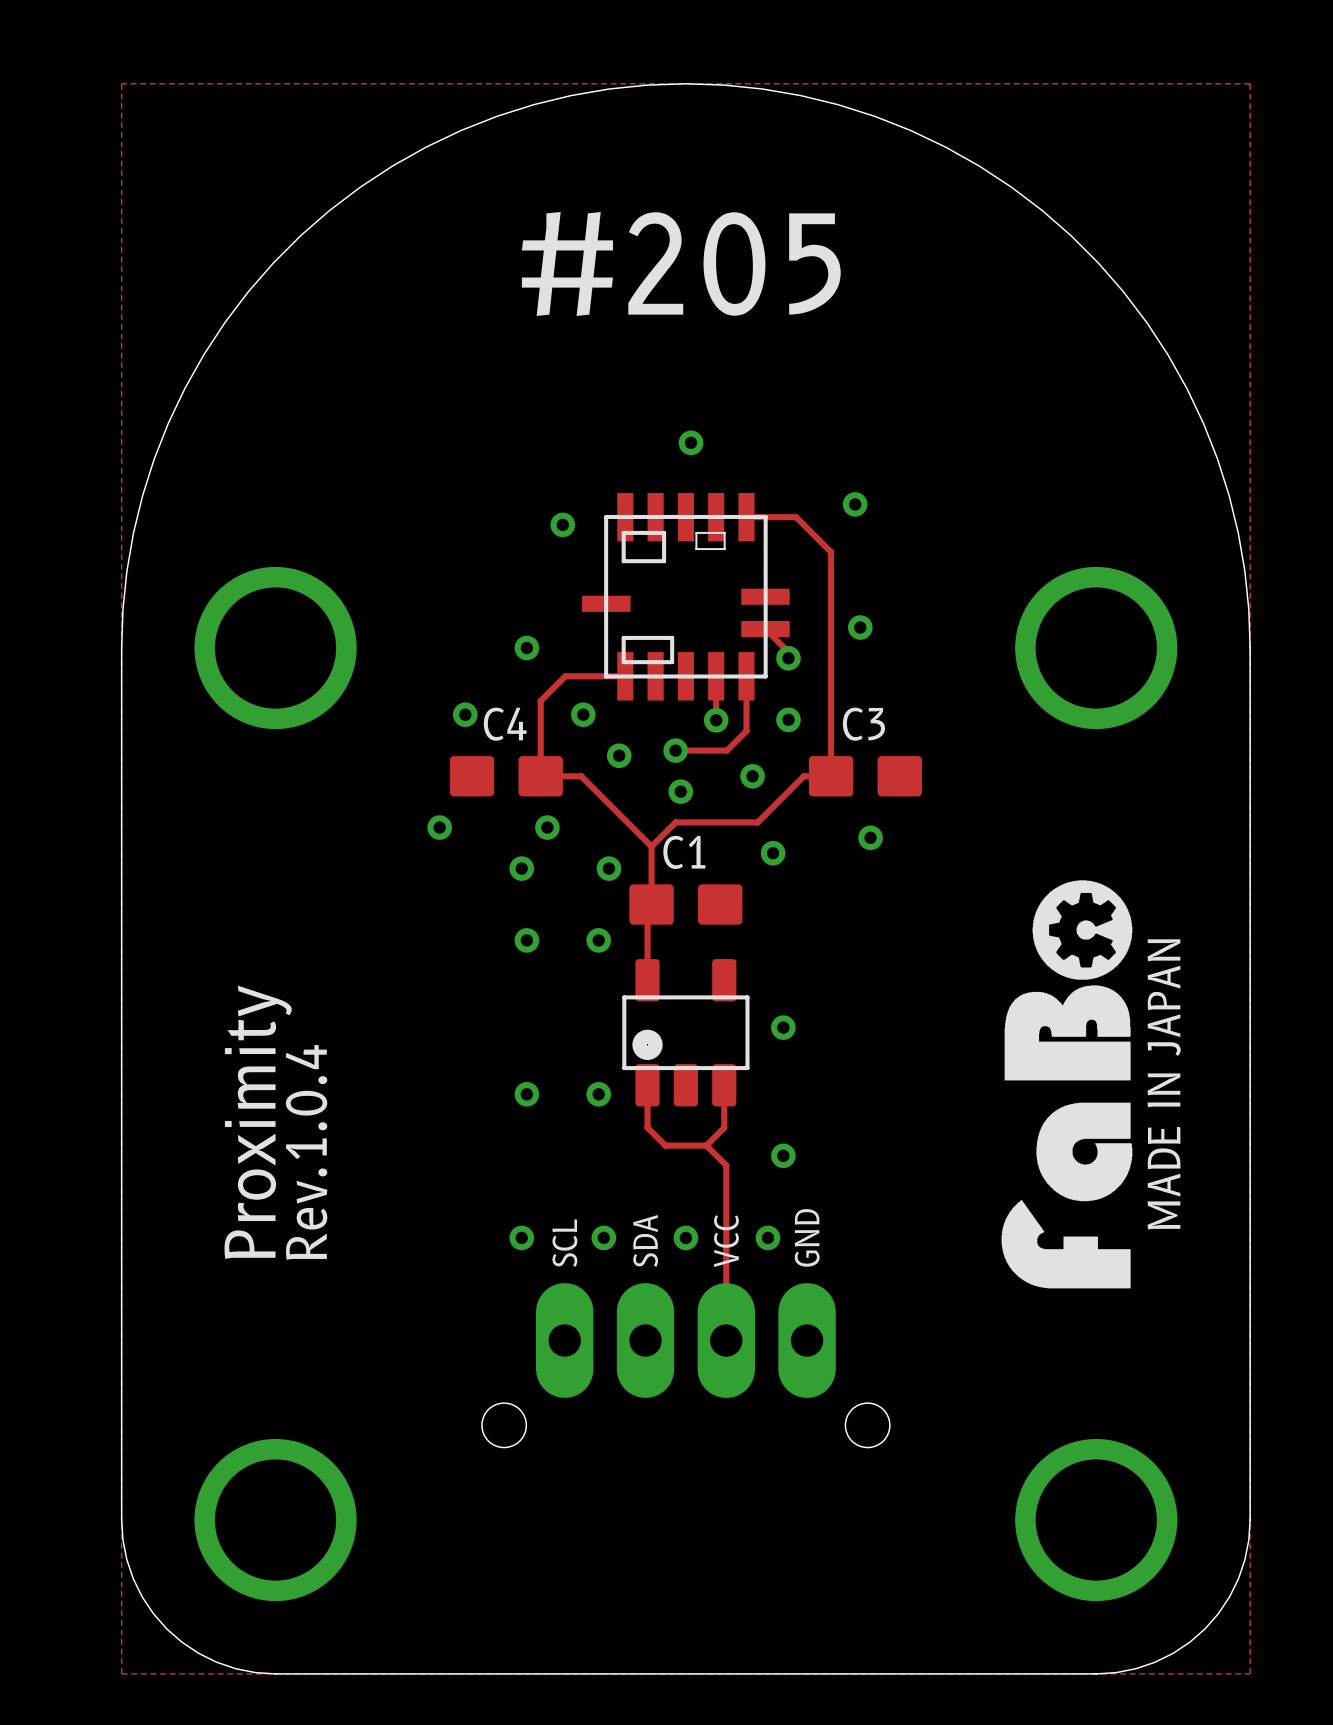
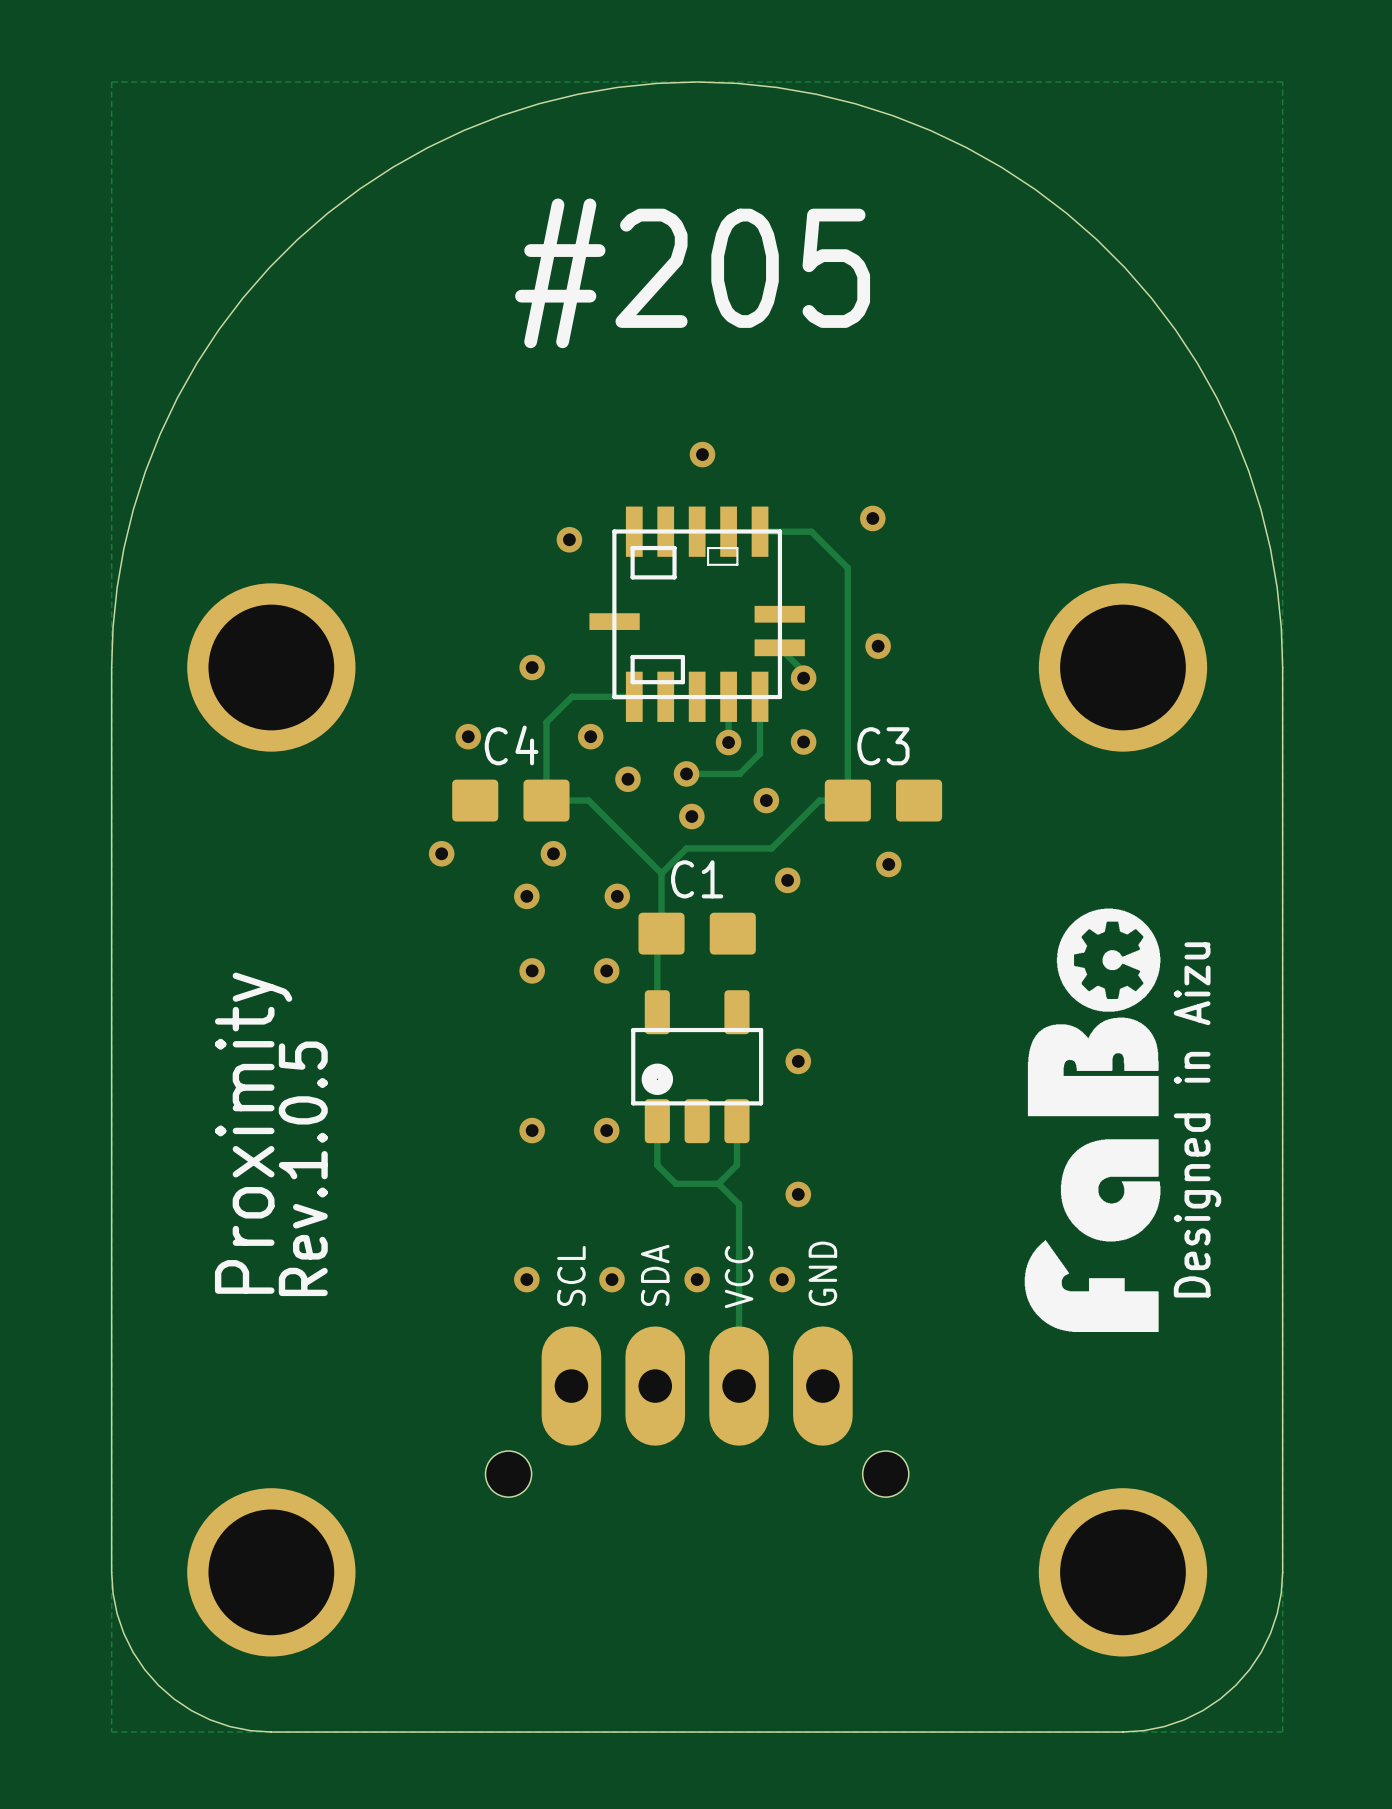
text: MADE IN JAPAN (1164, 1084) -> Designed in Aizu (1197, 1119)
text: Rev.1.0.4 (306, 1152) -> Rev.1.0.5 (303, 1168)

